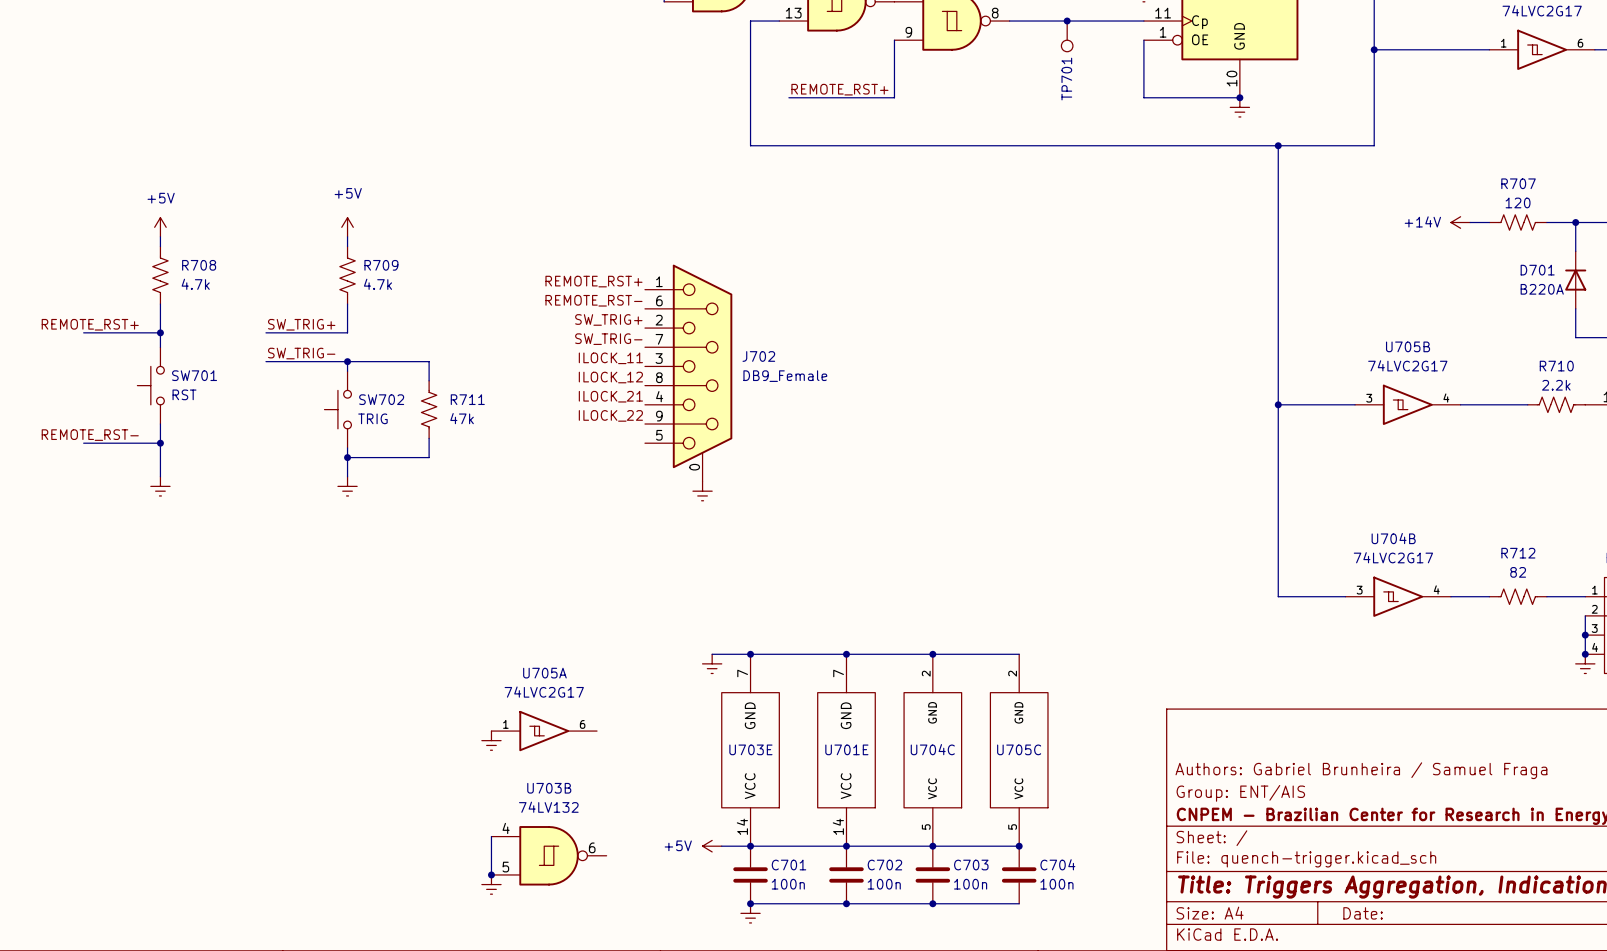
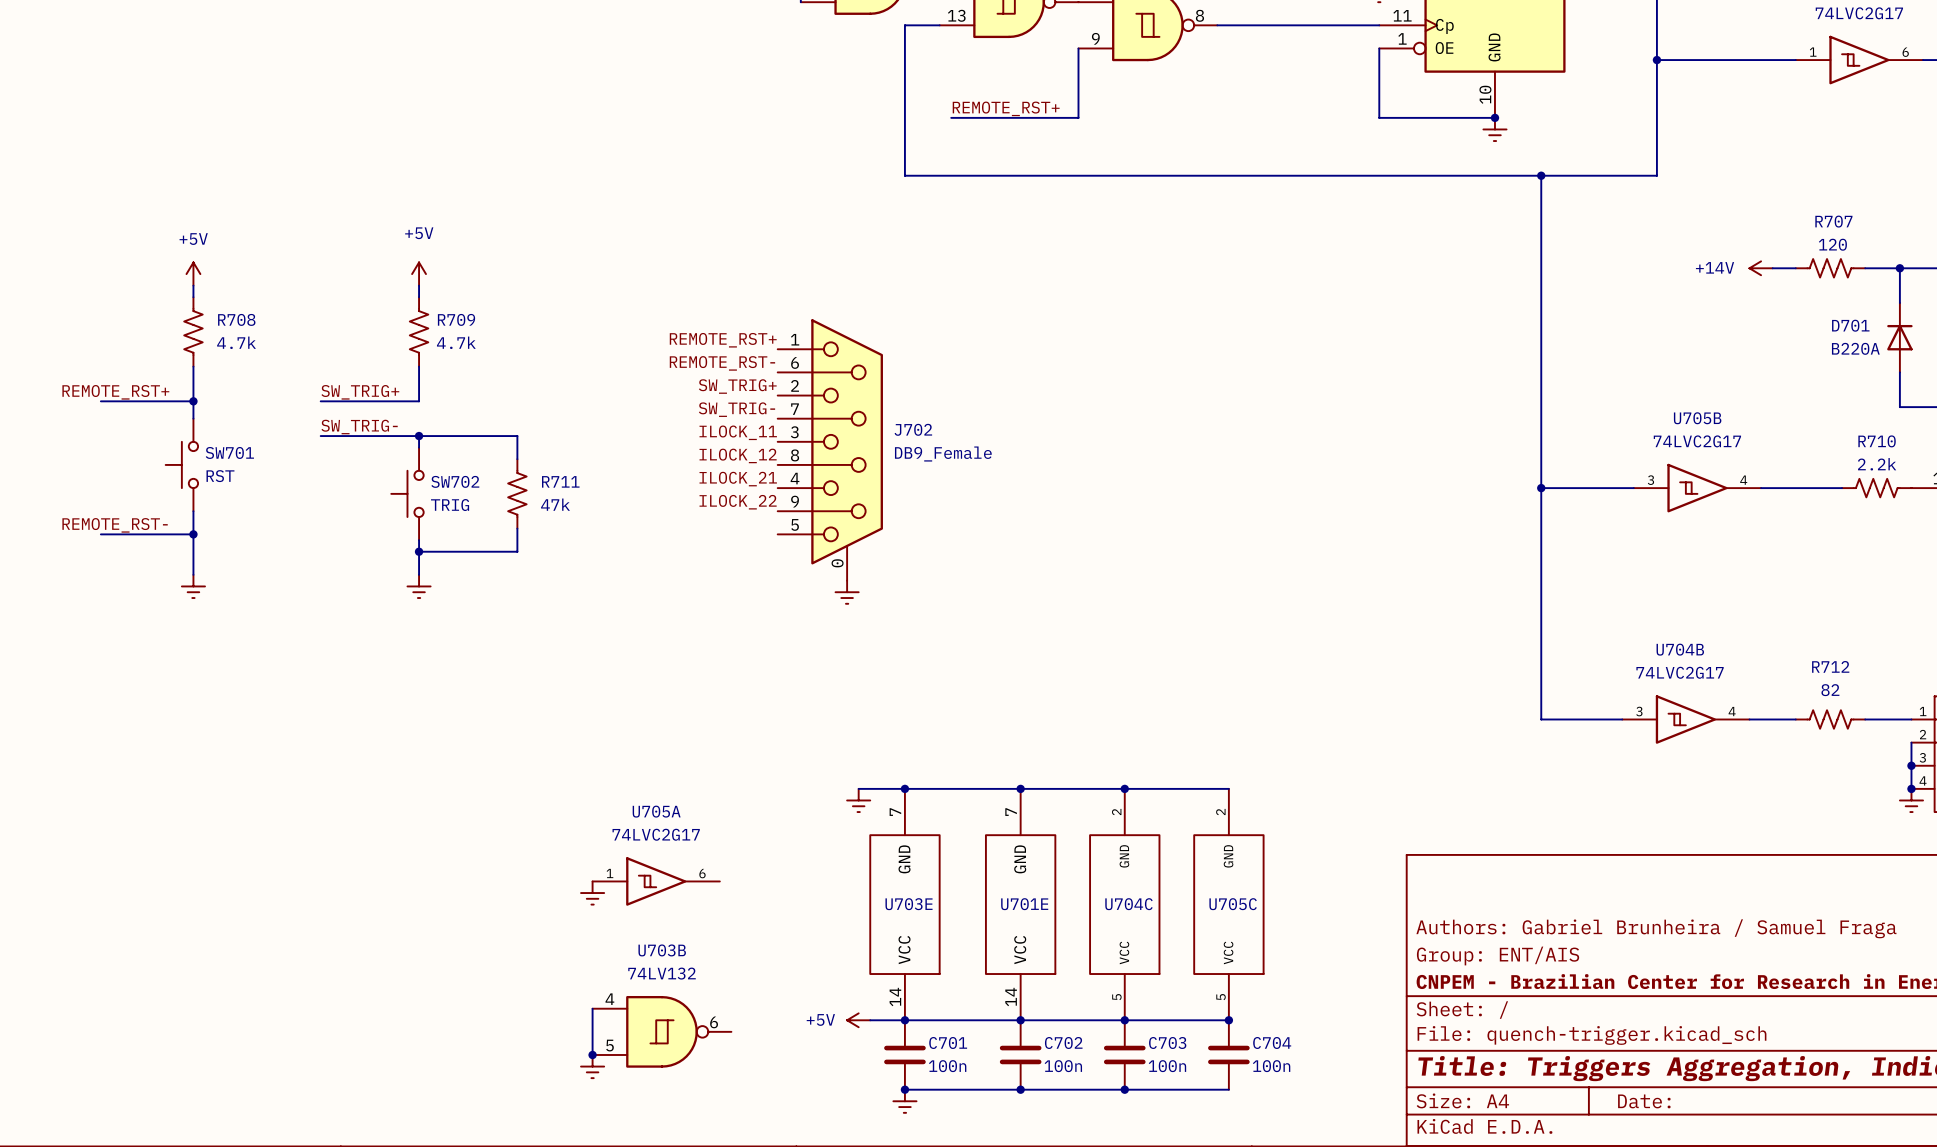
junction: (1067, 21) -> none
TP701: (1067, 36) -> none

